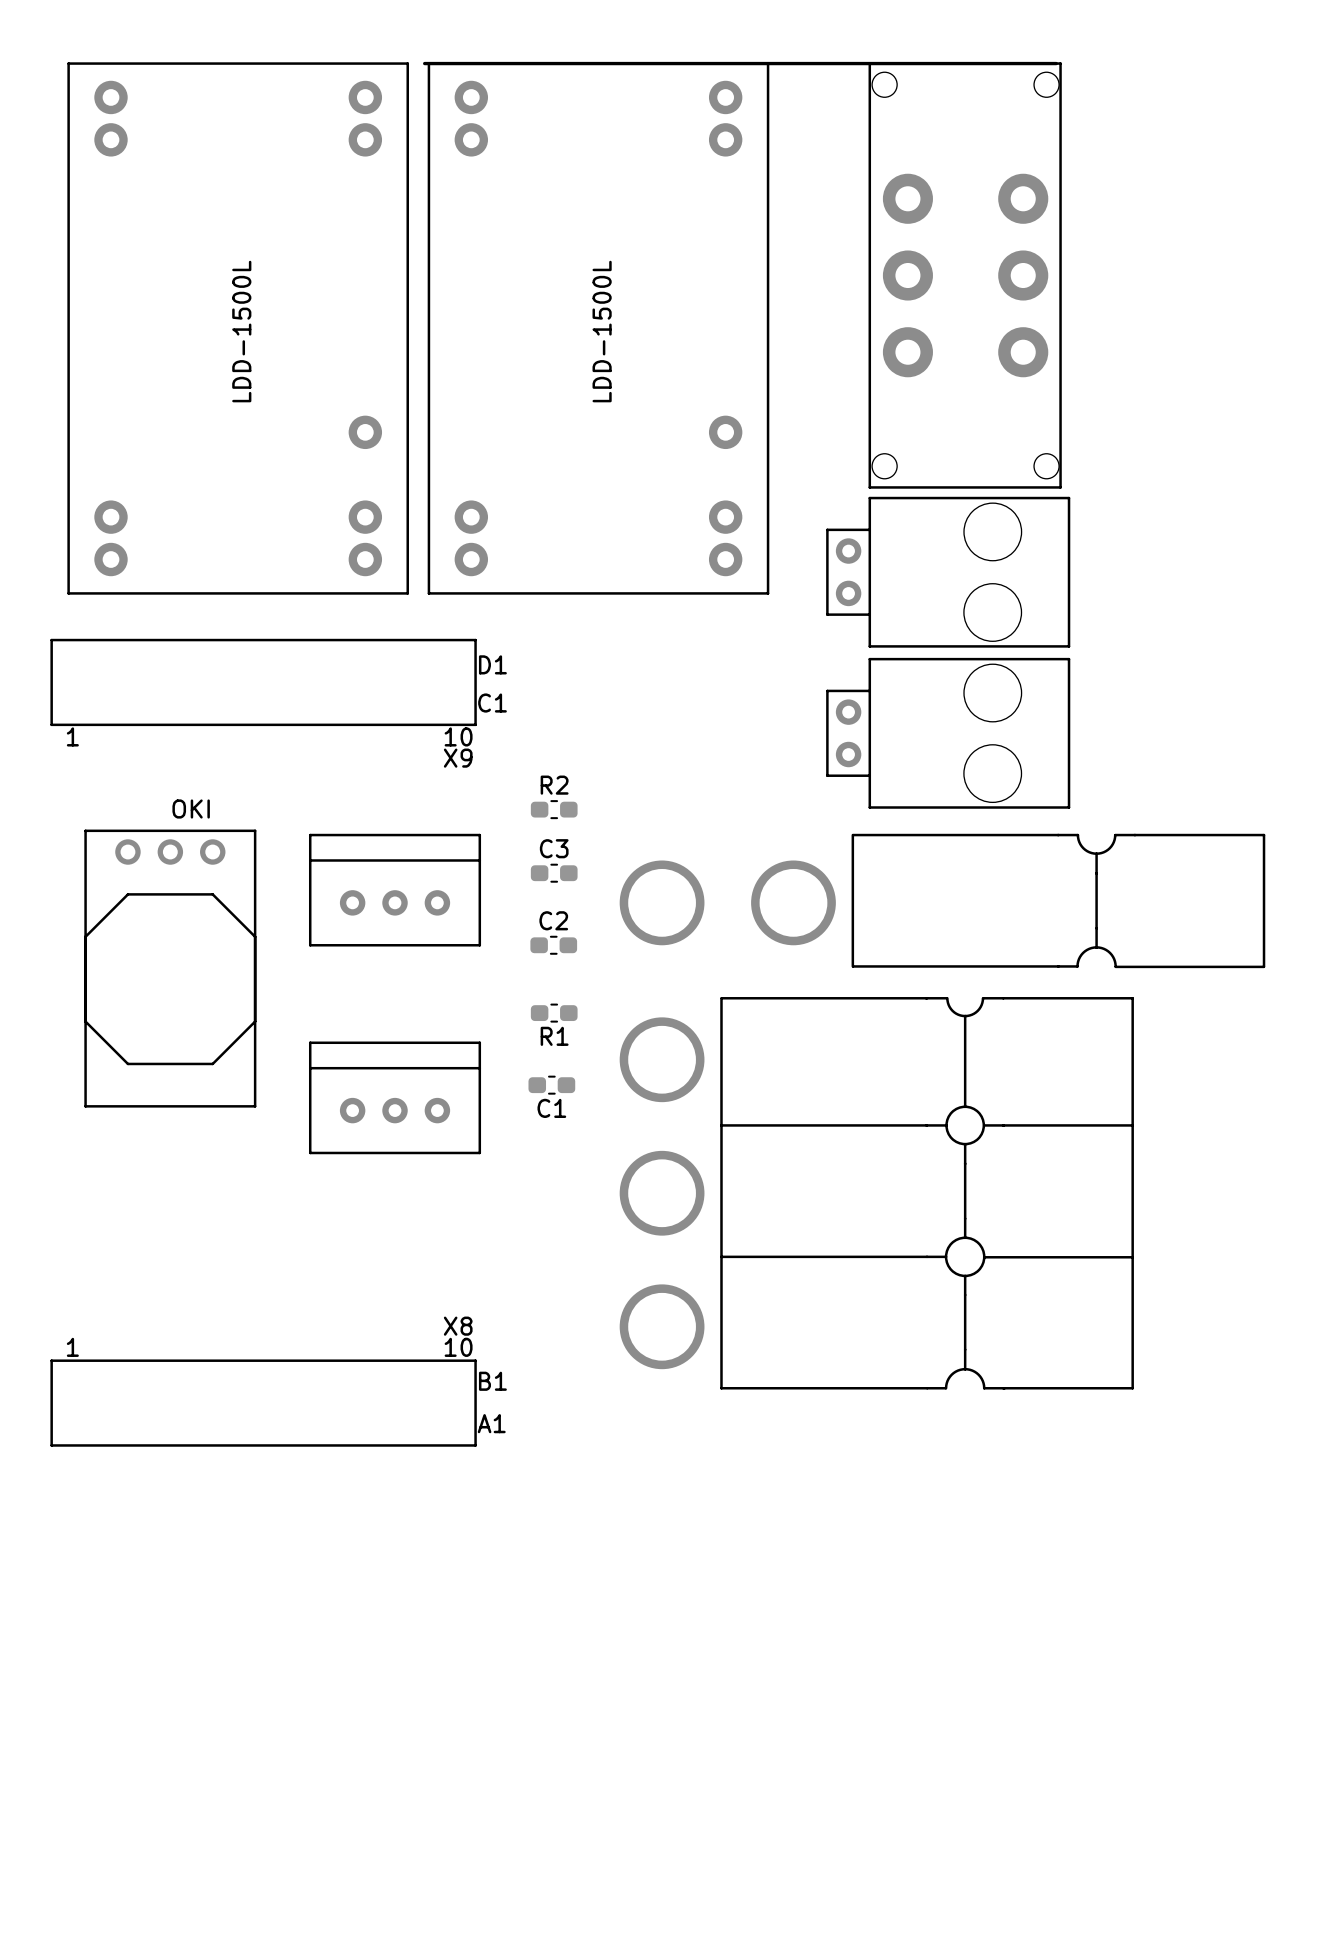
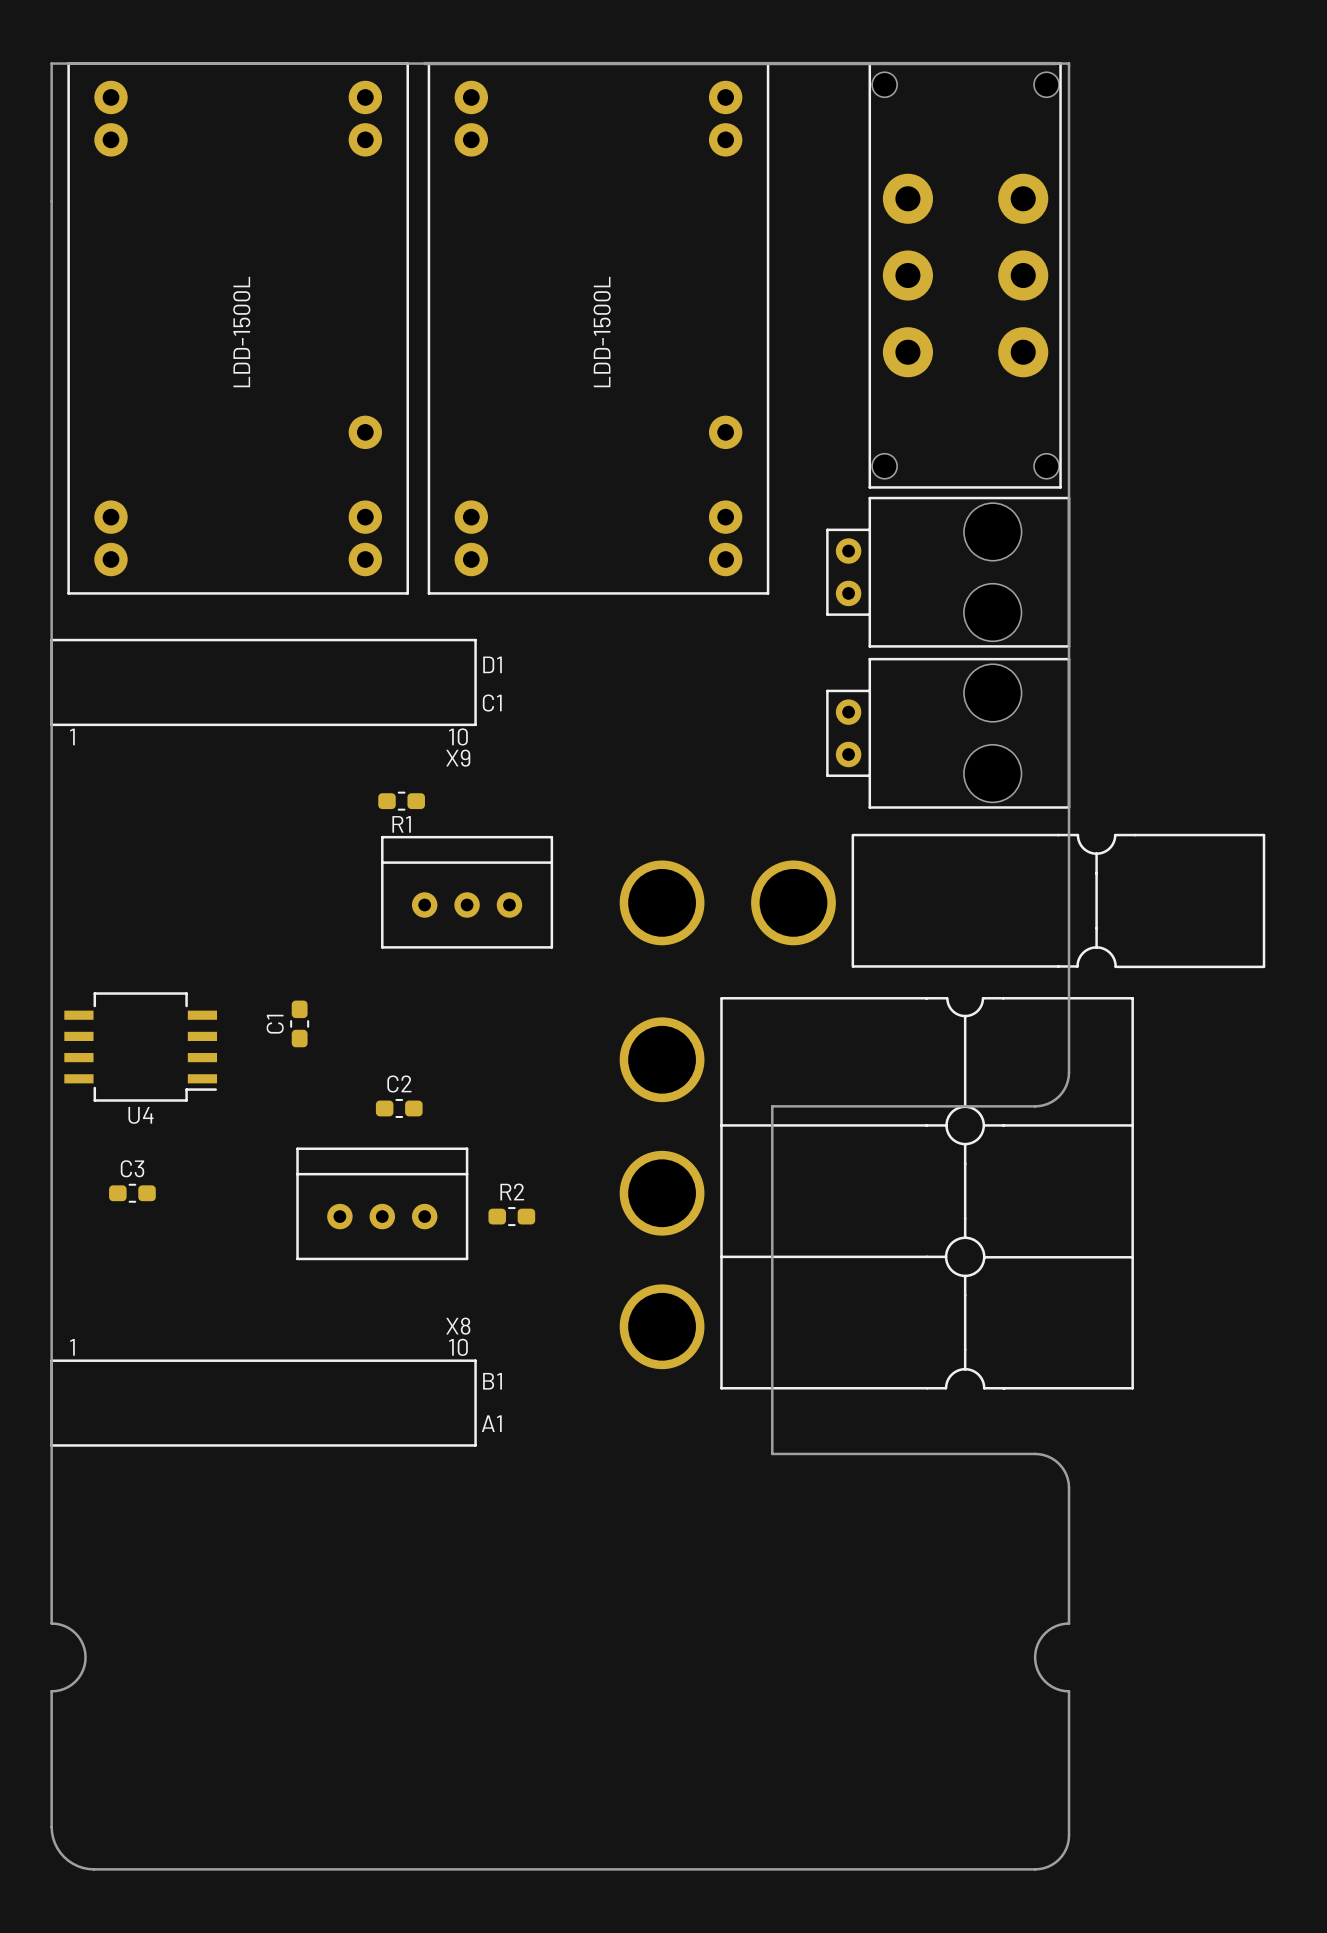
board edge: none -> (424, 63) (51, 63) (51, 1623) (64, 1626) (75, 1633) (82, 1644) (85, 1657) (82, 1670) (75, 1681) (64, 1688) (51, 1691) (51, 1826) (54, 1843) (64, 1856) (72, 1863) (88, 1869) (1035, 1869) (1052, 1864) (1064, 1852) (1069, 1835) (1069, 1691) (1056, 1688) (1045, 1681) (1037, 1670) (1035, 1657) (1037, 1644) (1045, 1633) (1056, 1626) (1069, 1623) (1069, 1487) (1066, 1474) (1062, 1467) (1052, 1458) (1035, 1453) (772, 1453) (772, 1106) (1039, 1106) (1055, 1099) (1062, 1093) (1067, 1081) (1069, 63) (1056, 63)
R2 position: (554, 809) -> (511, 1216)
C3 position: (554, 873) -> (132, 1193)
part position: (395, 890) -> (467, 892)
C2 position: (553, 945) -> (399, 1108)
part: OKI (170, 968) -> none
R1 position: (554, 1013) -> (401, 801)
U4: none -> (140, 1047)
C1 rotation: 0° (551, 1085) -> 90° clockwise (299, 1023)
C1 position: (551, 1085) -> (299, 1023)
part position: (395, 1097) -> (382, 1203)

